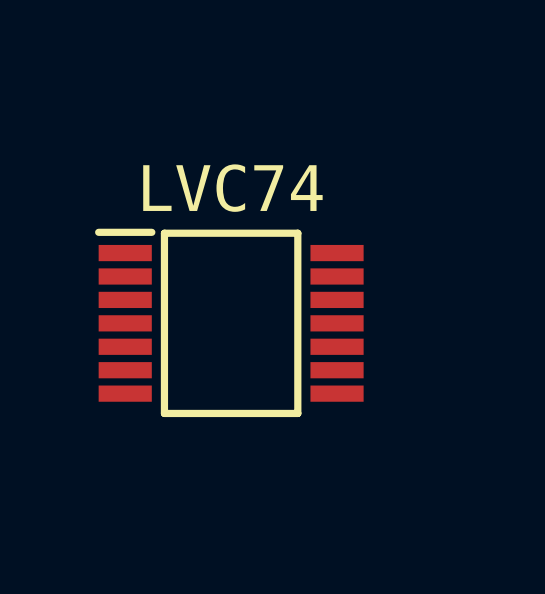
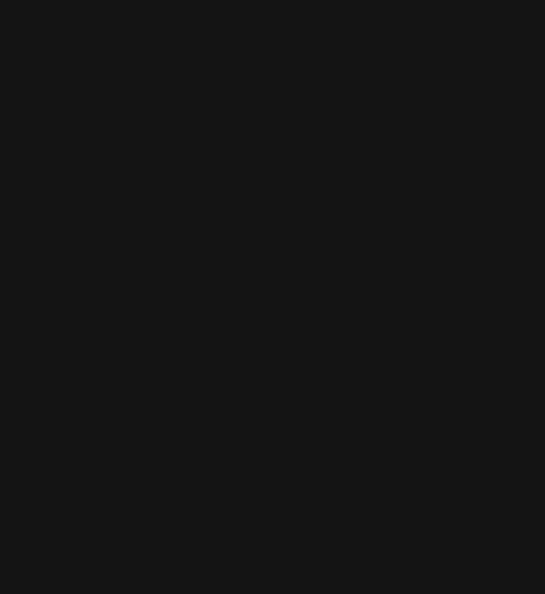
LVC74: (229, 322) -> none

